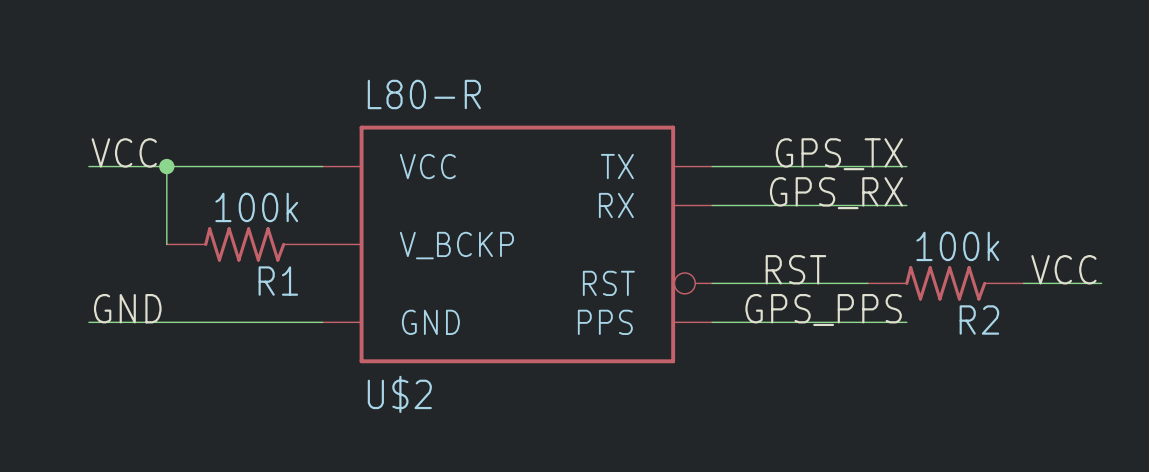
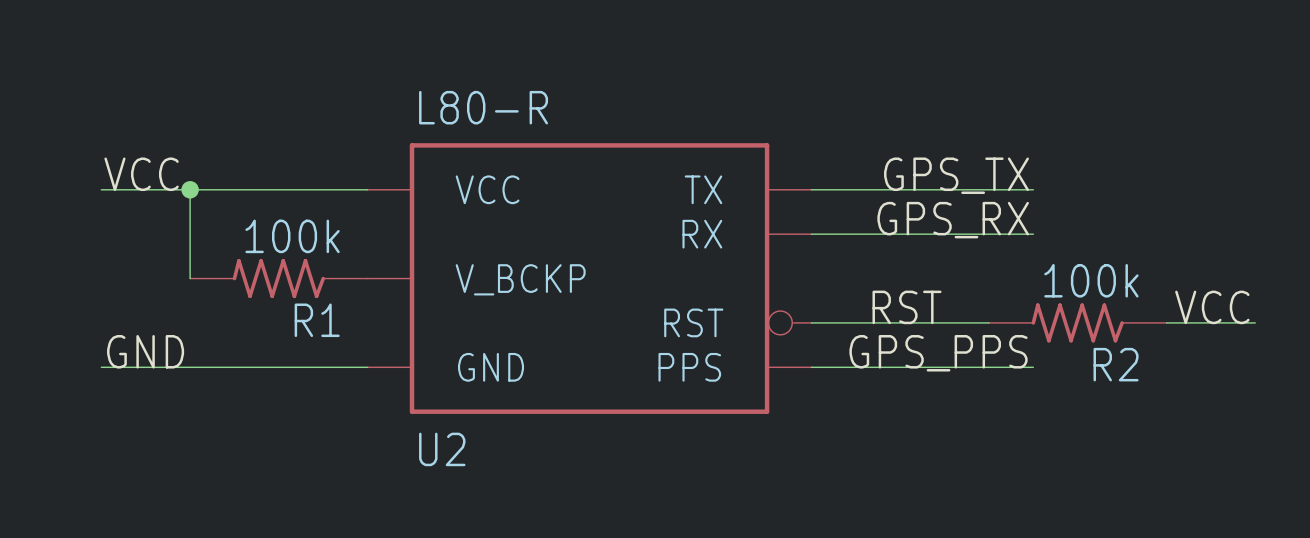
U$2 name: U$2 (399, 394) -> U2 (442, 449)

